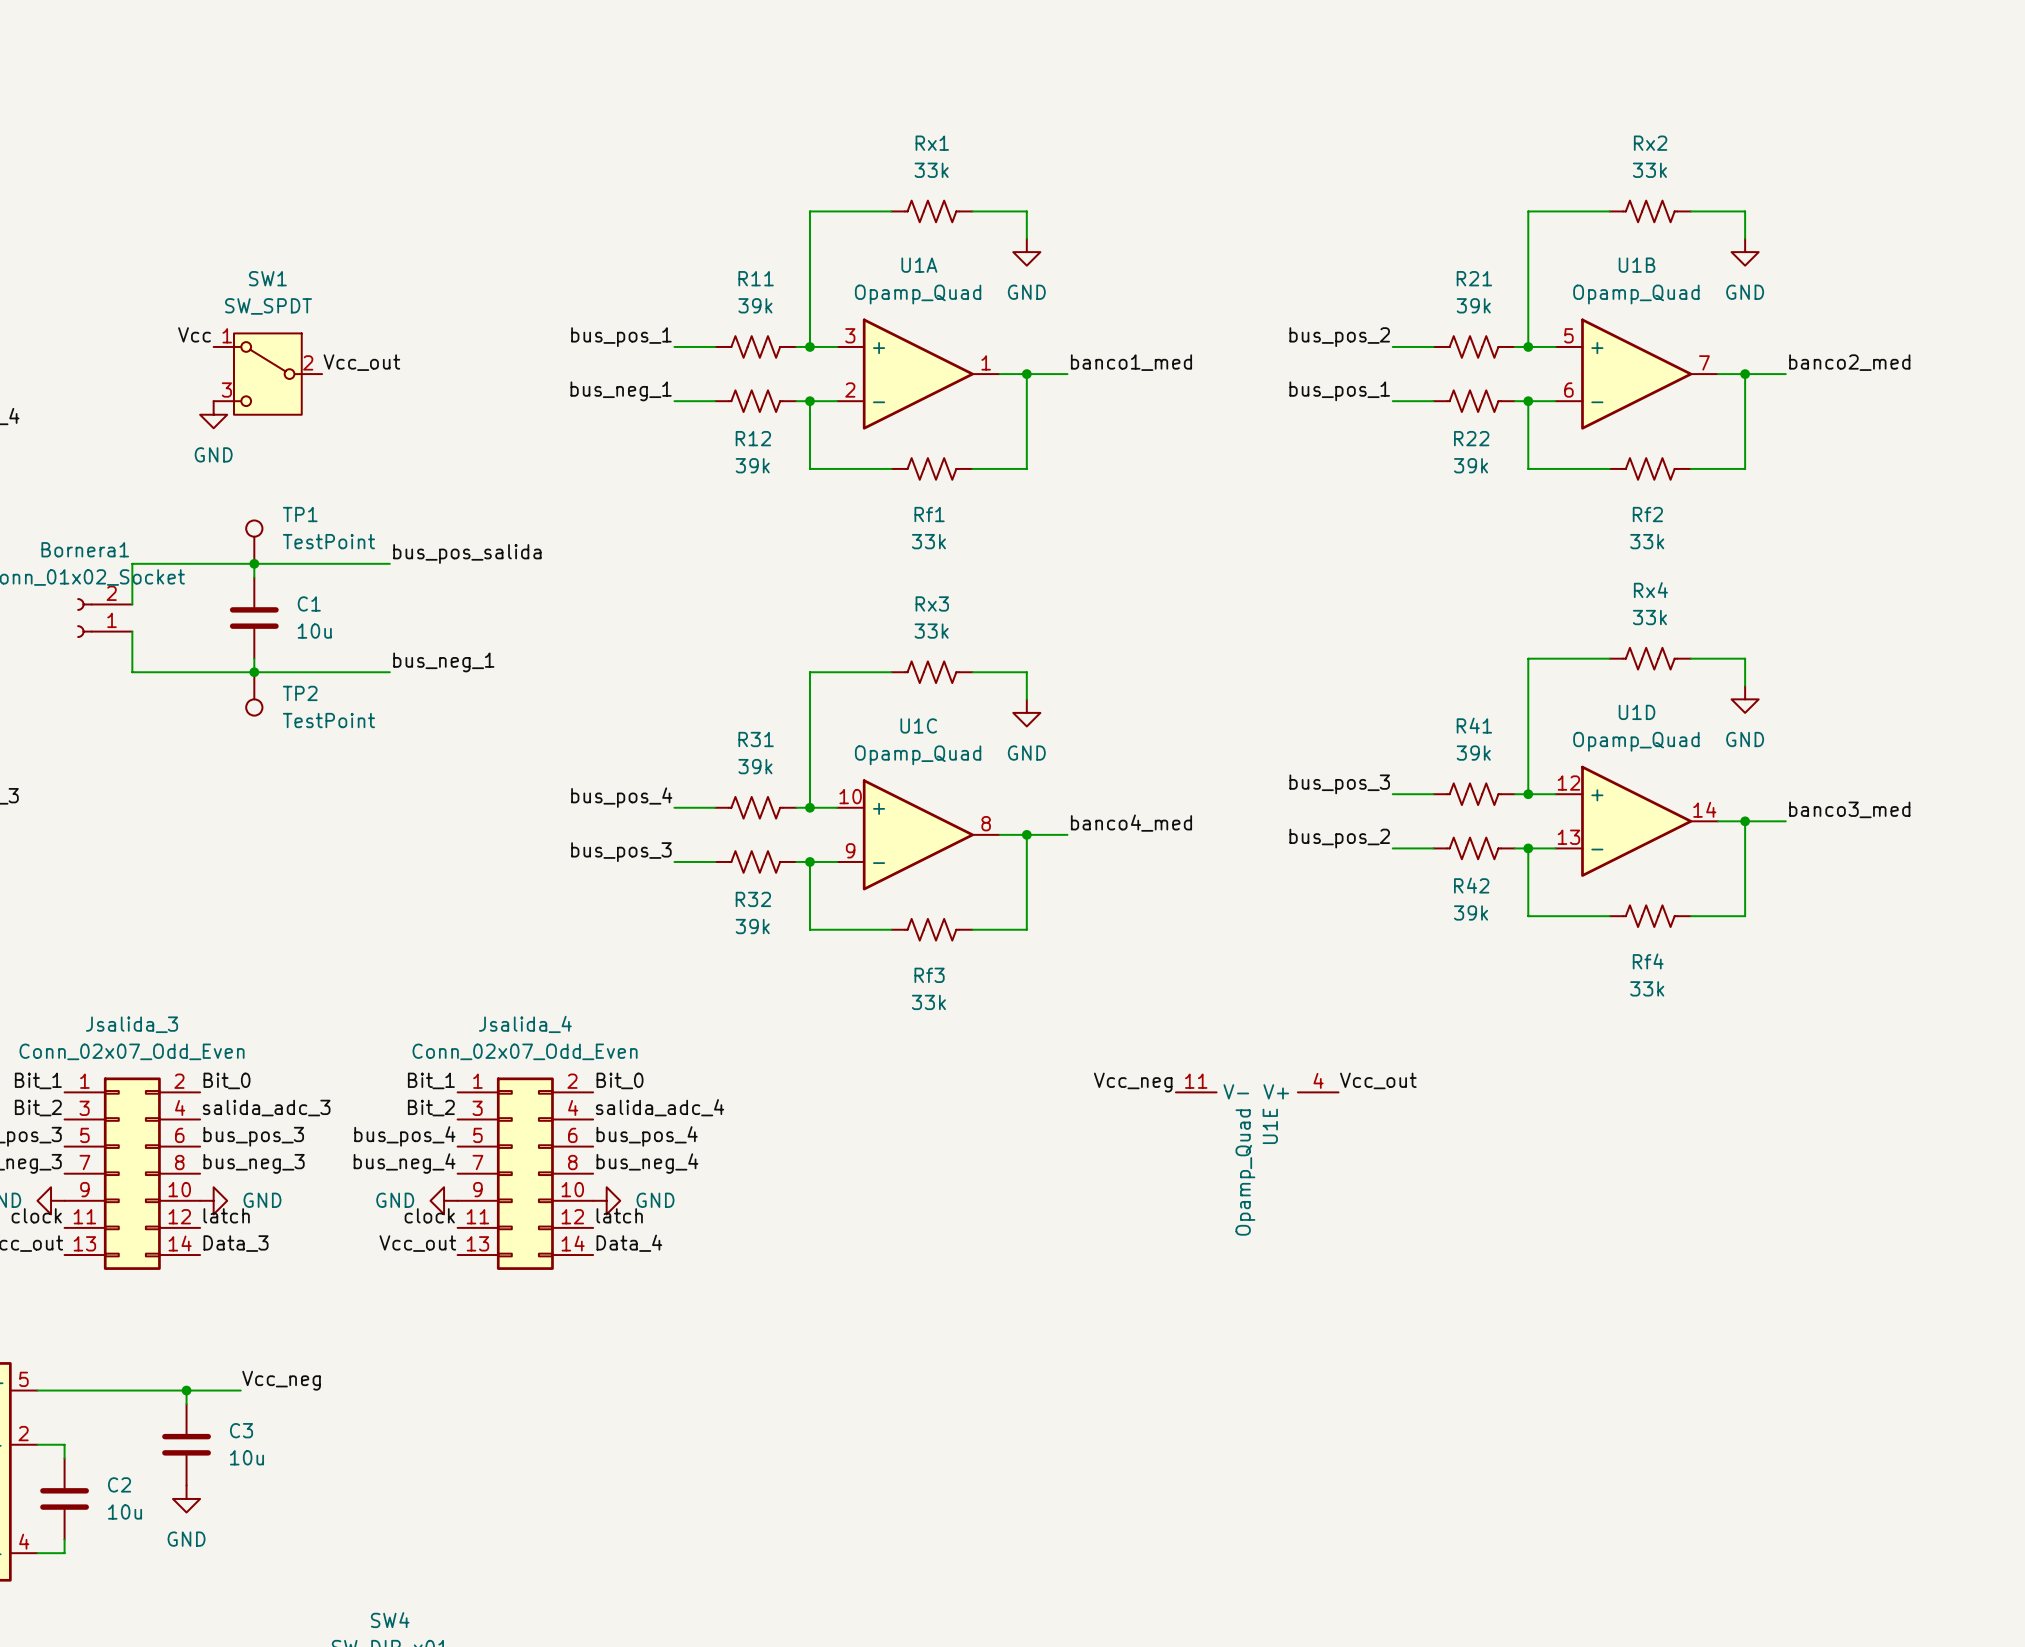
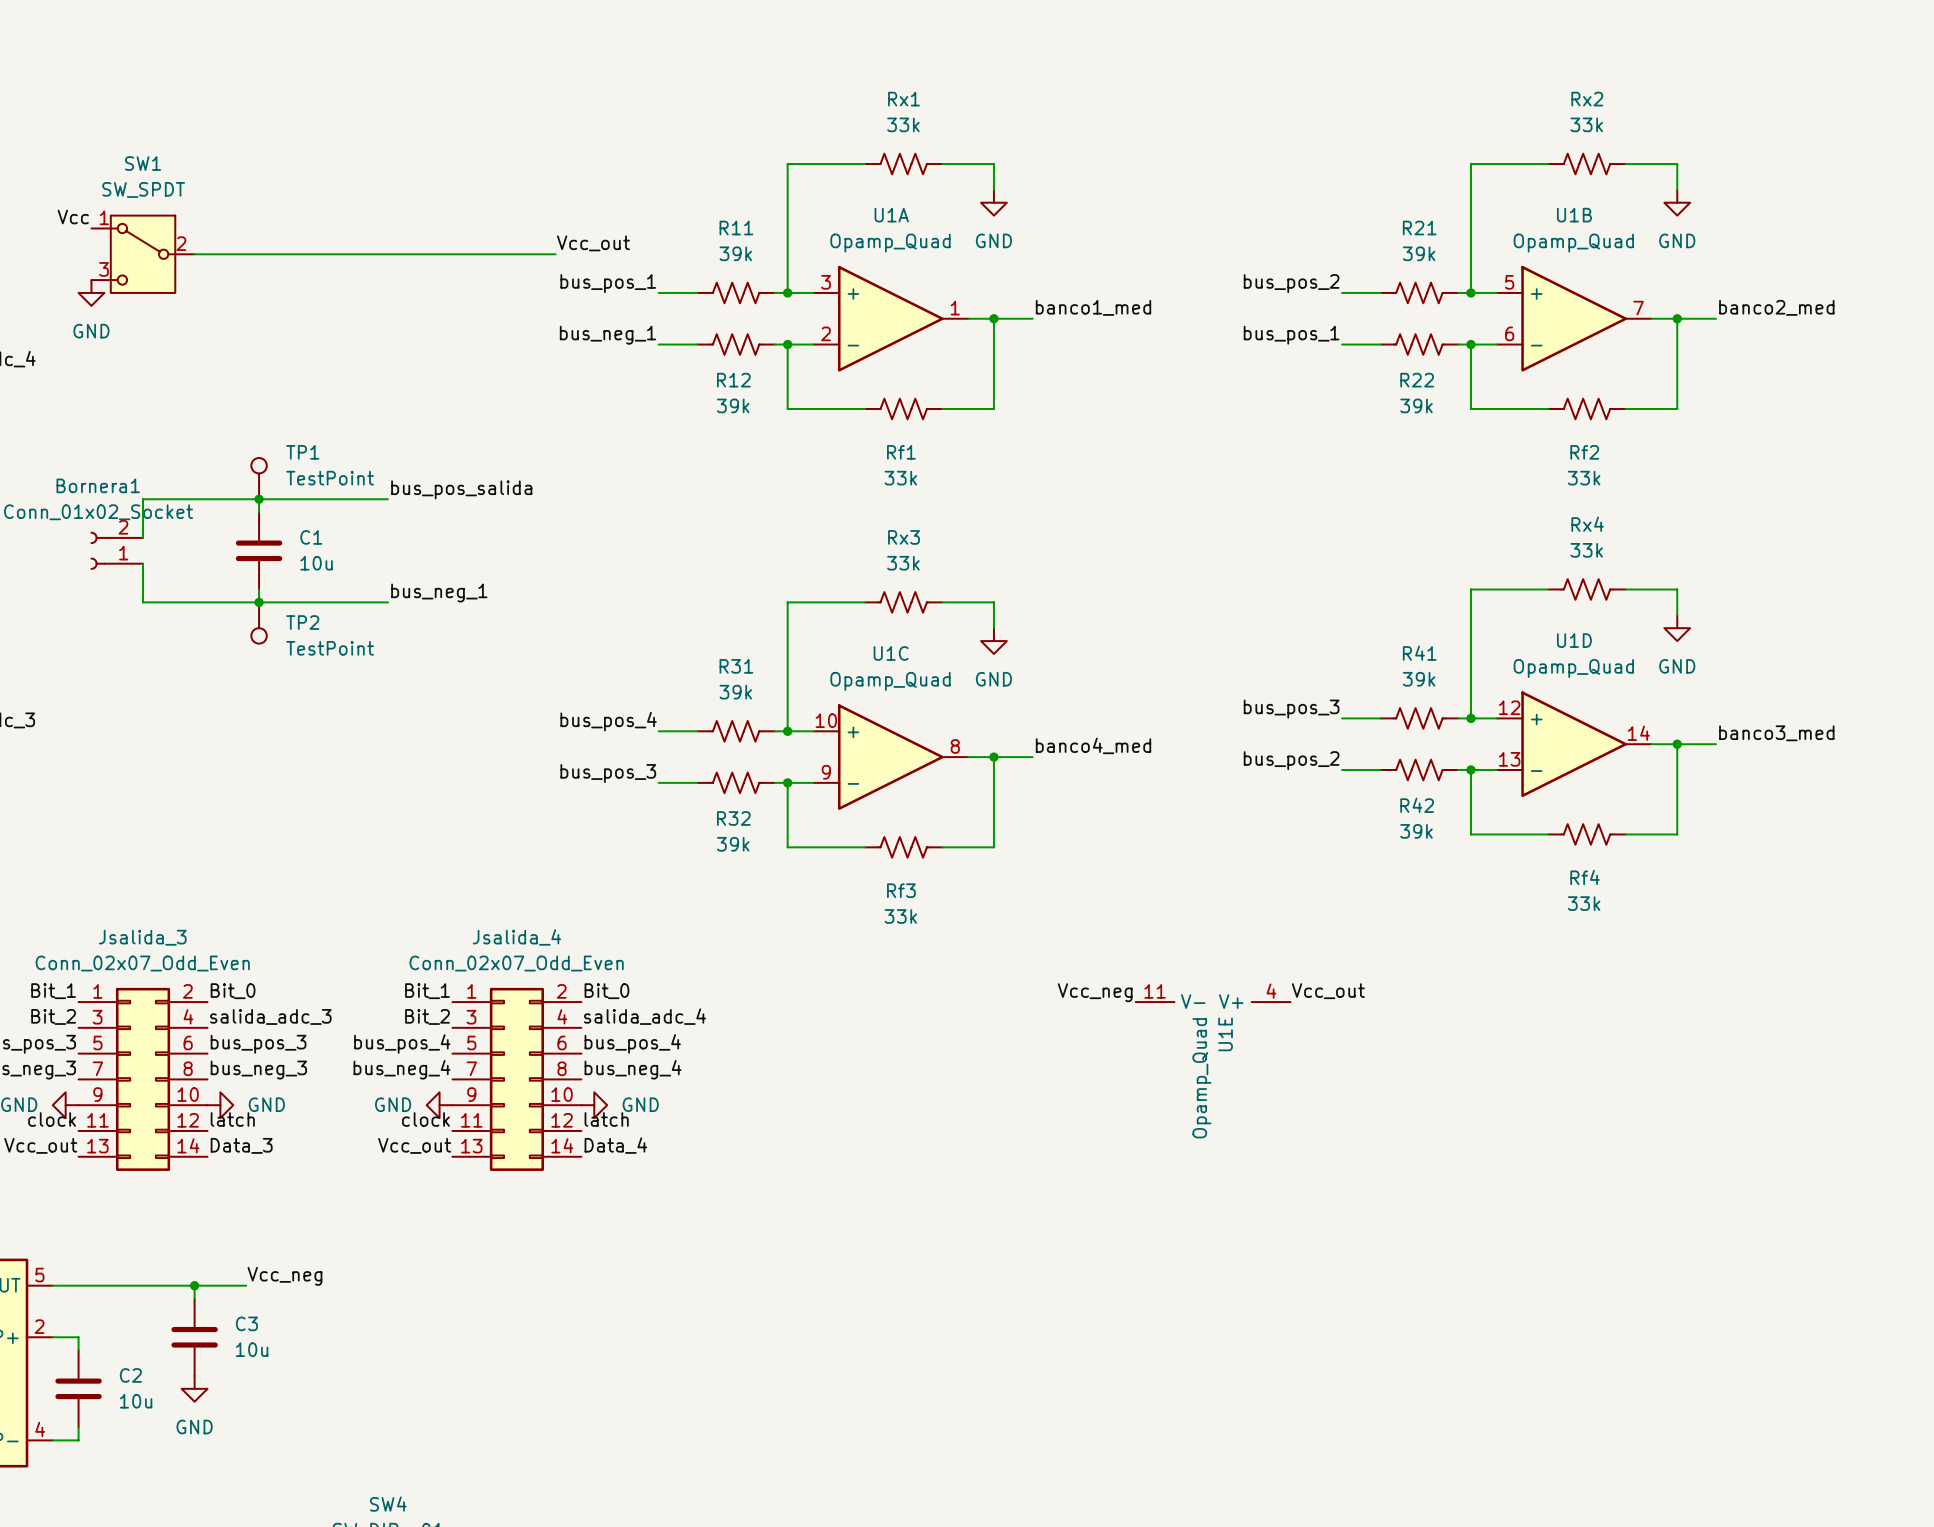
wire: none -> (194, 254) (555, 254)
label position: Vcc (194, 334) -> Vcc (73, 216)
label position: Vcc_out (361, 362) -> Vcc_out (593, 243)
SW1 position: (267, 374) -> (143, 254)
power symbol position: GND (213, 414) -> GND (91, 292)

